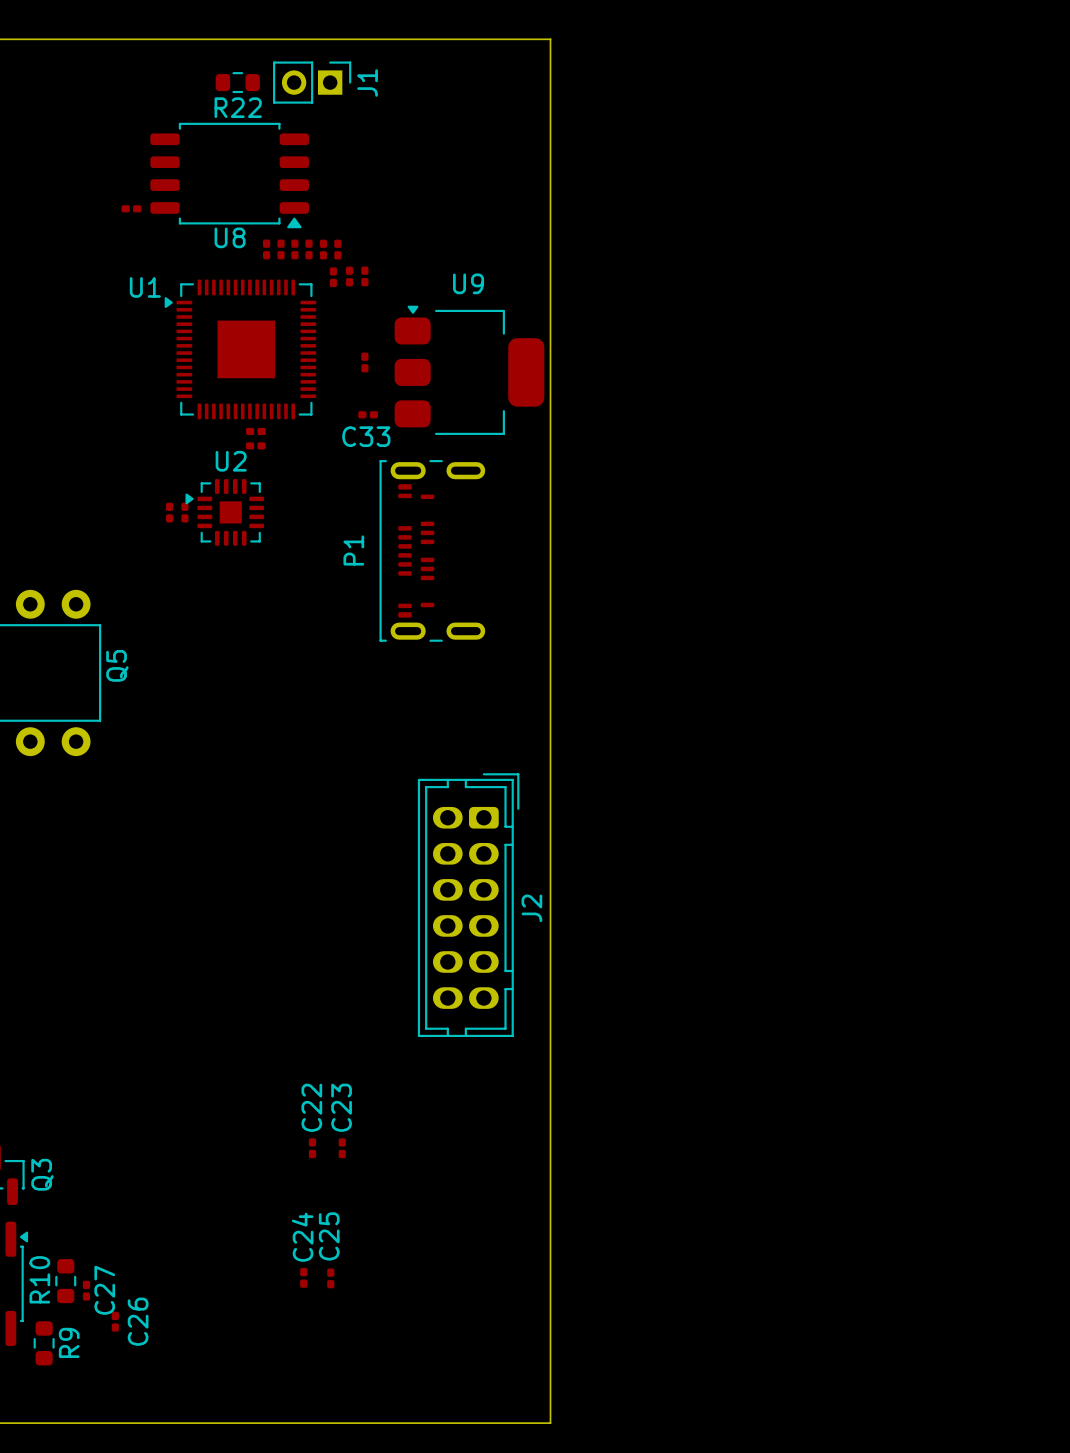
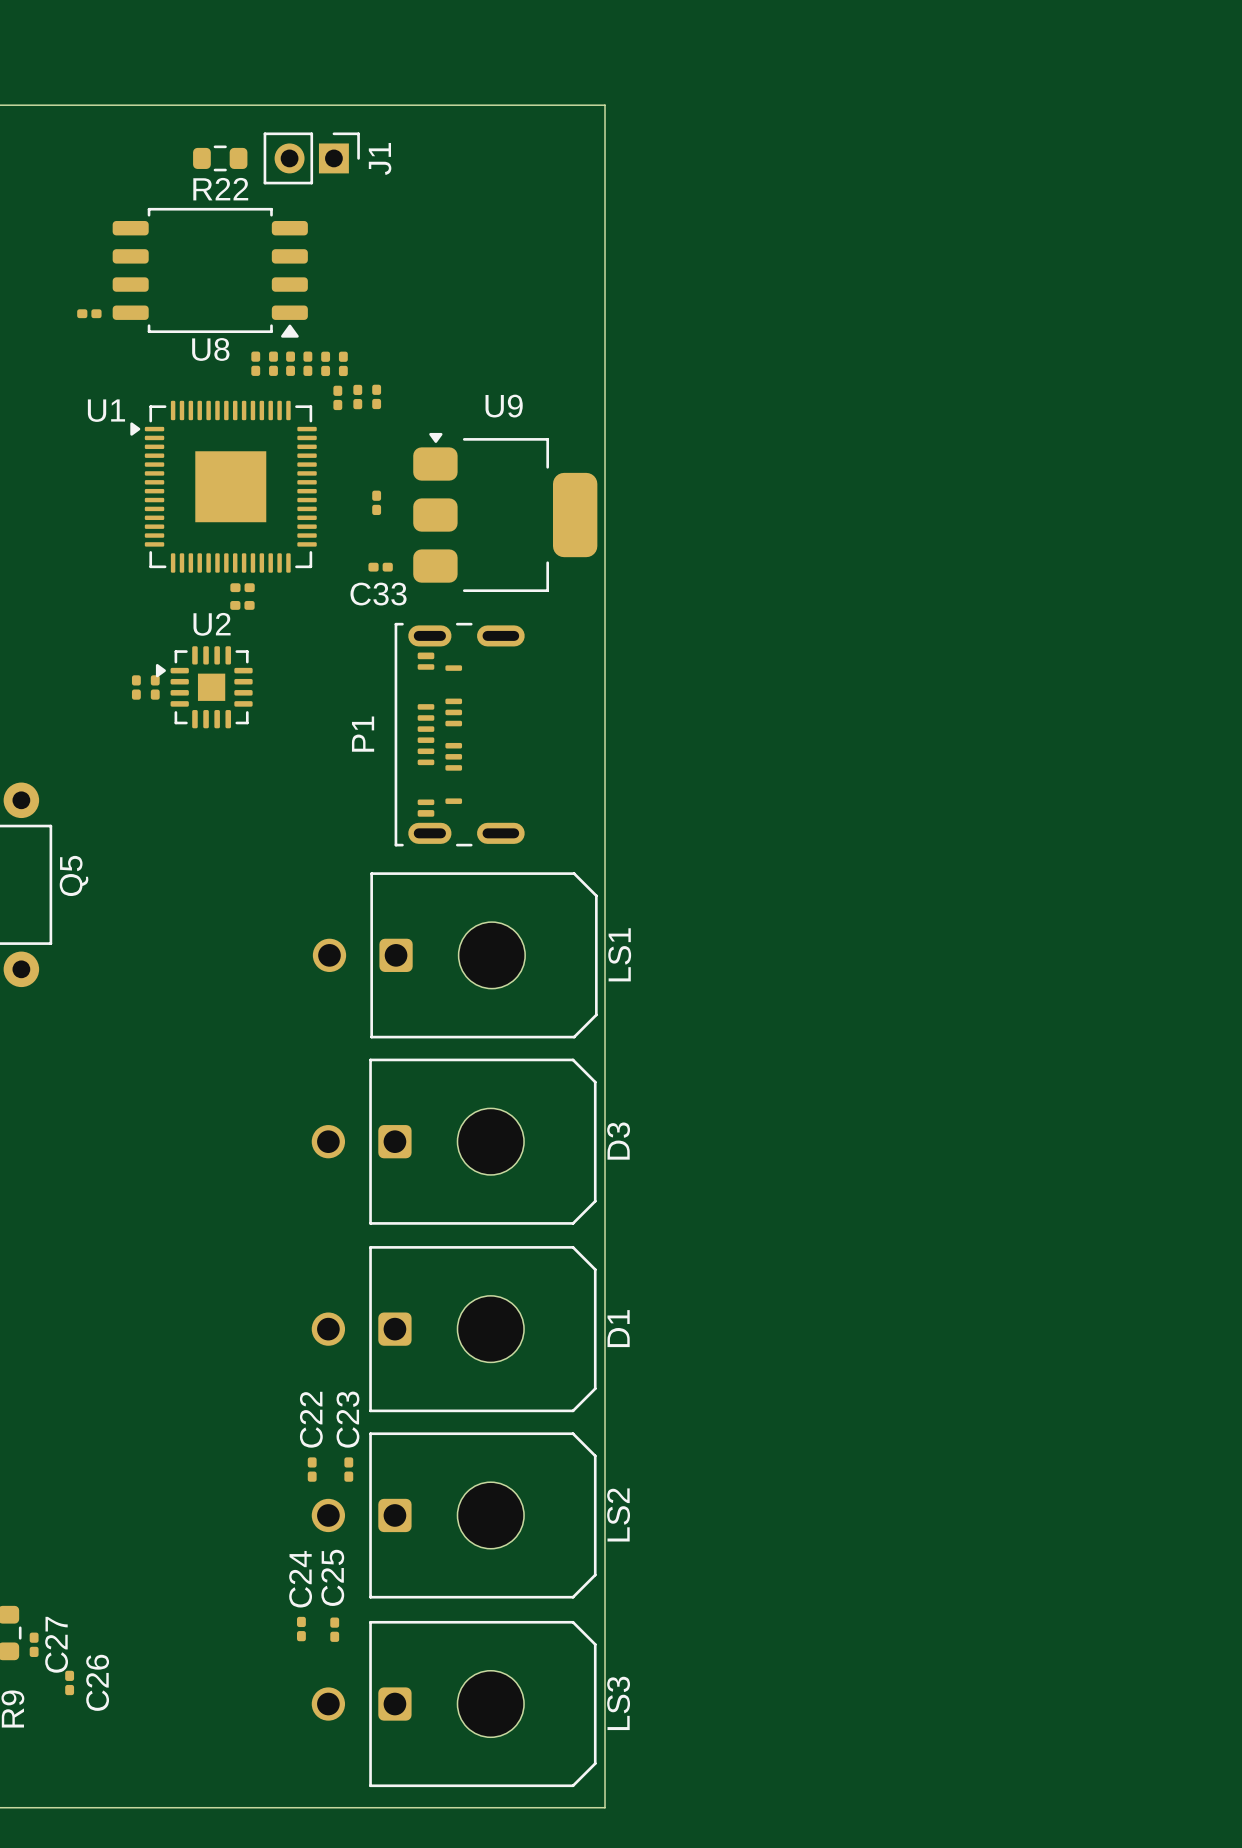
LS1: none -> (455, 955)
D3: none -> (454, 1141)
J2: (468, 905) -> none
D1: none -> (454, 1329)
LS2: none -> (454, 1515)
LS3: none -> (454, 1704)

